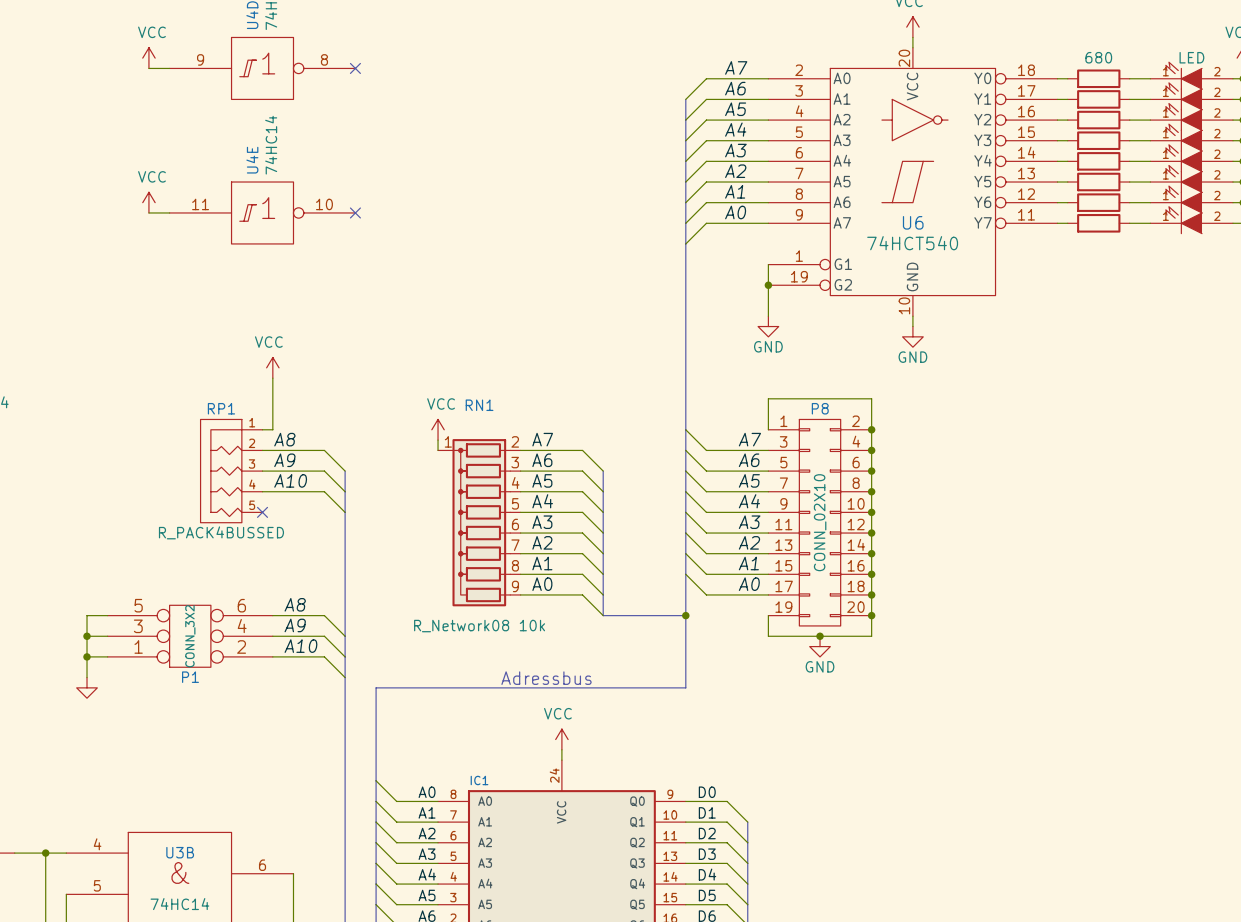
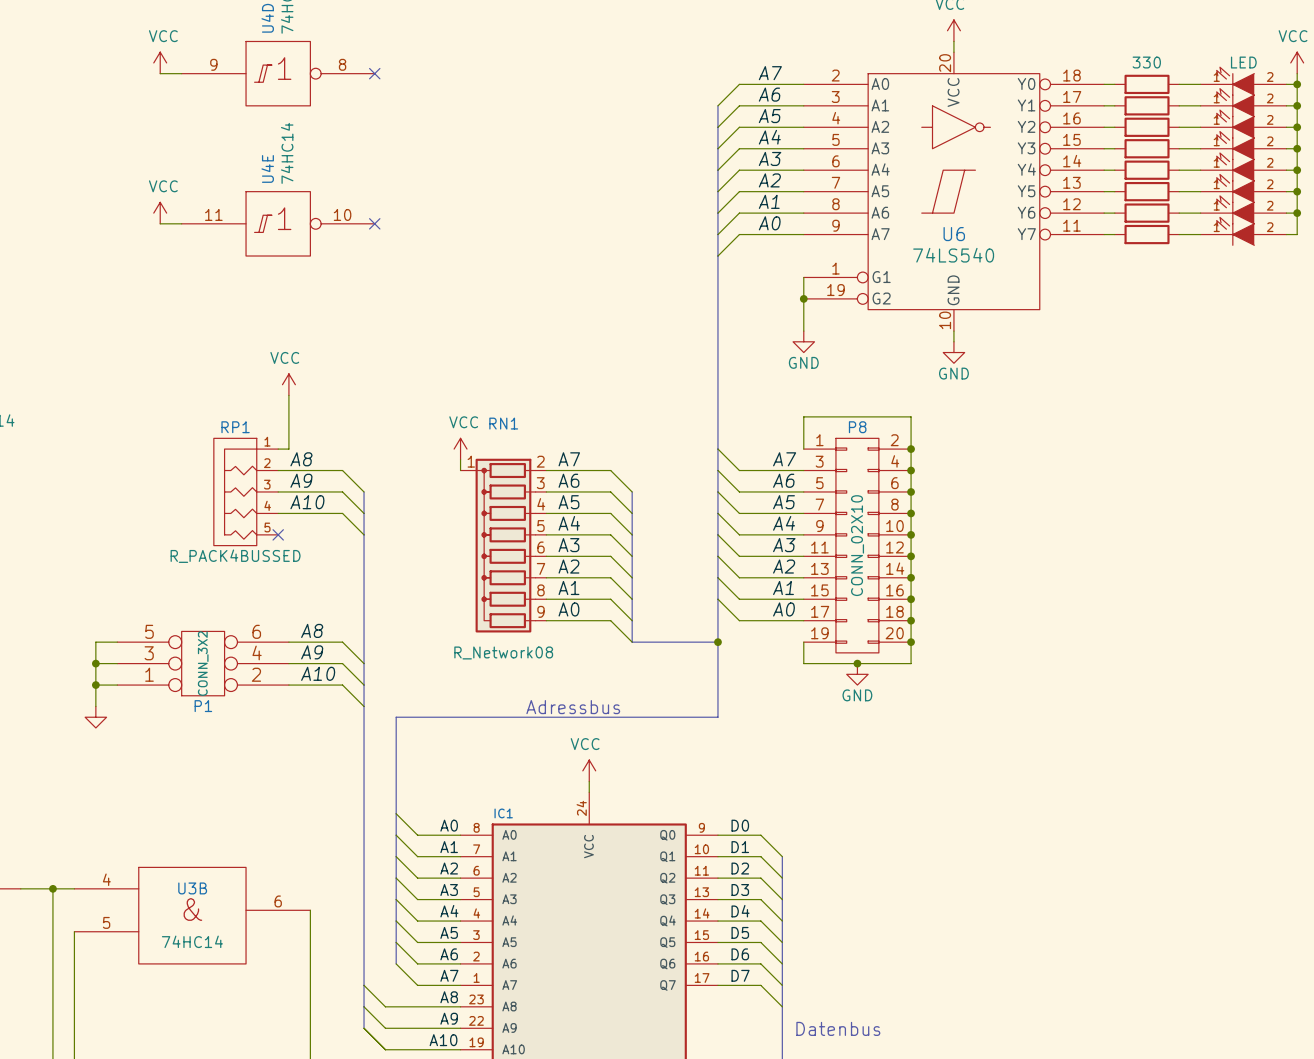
part value: 680 (1098, 57) -> 330 (1146, 62)
U6 value: 74HCT540 (912, 243) -> 74LS540 (953, 255)
RN1 value: R_Network08 10k (479, 626) -> R_Network08 (503, 652)

